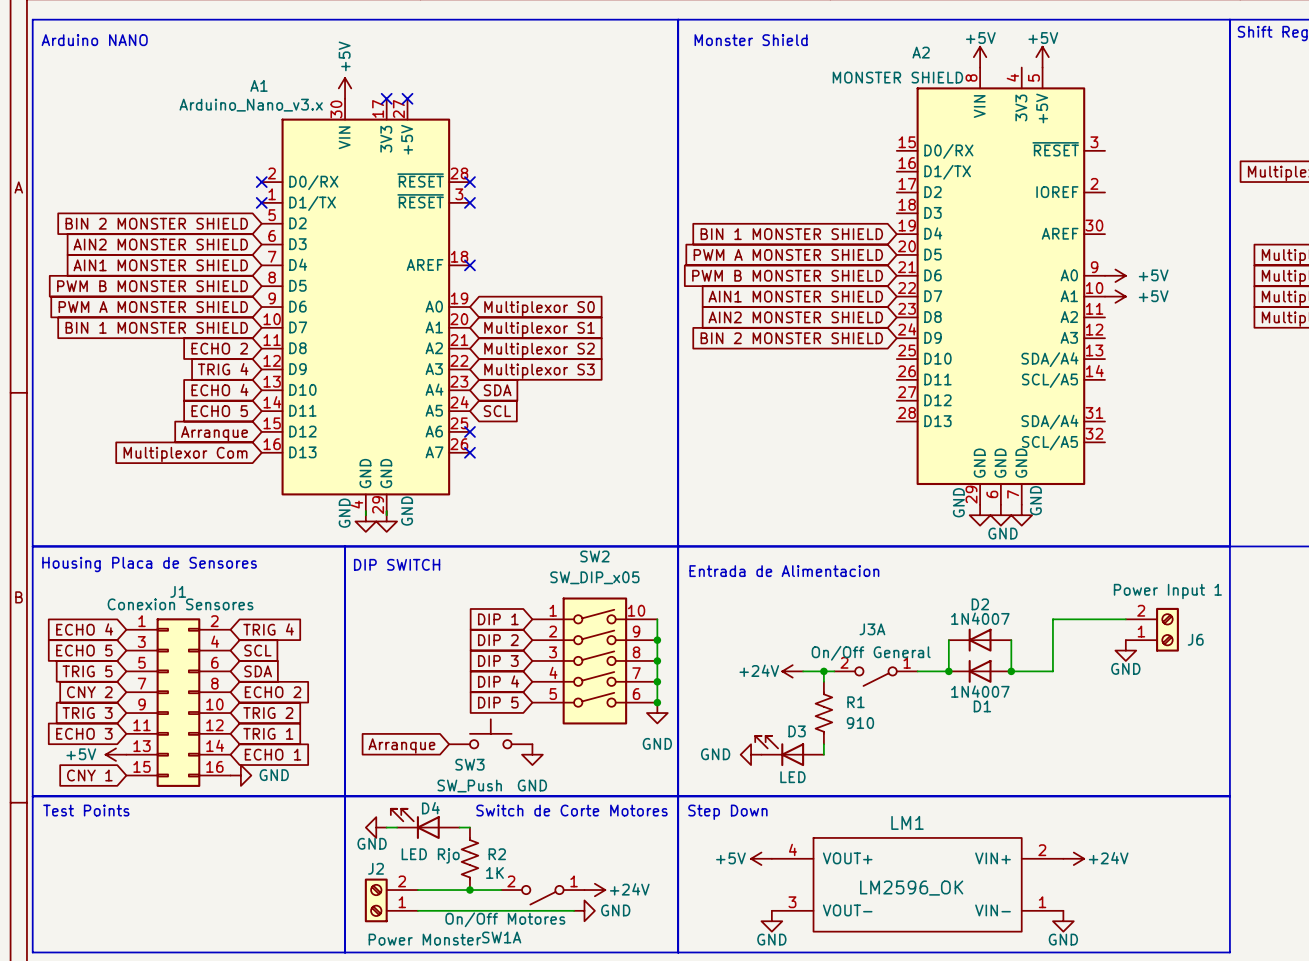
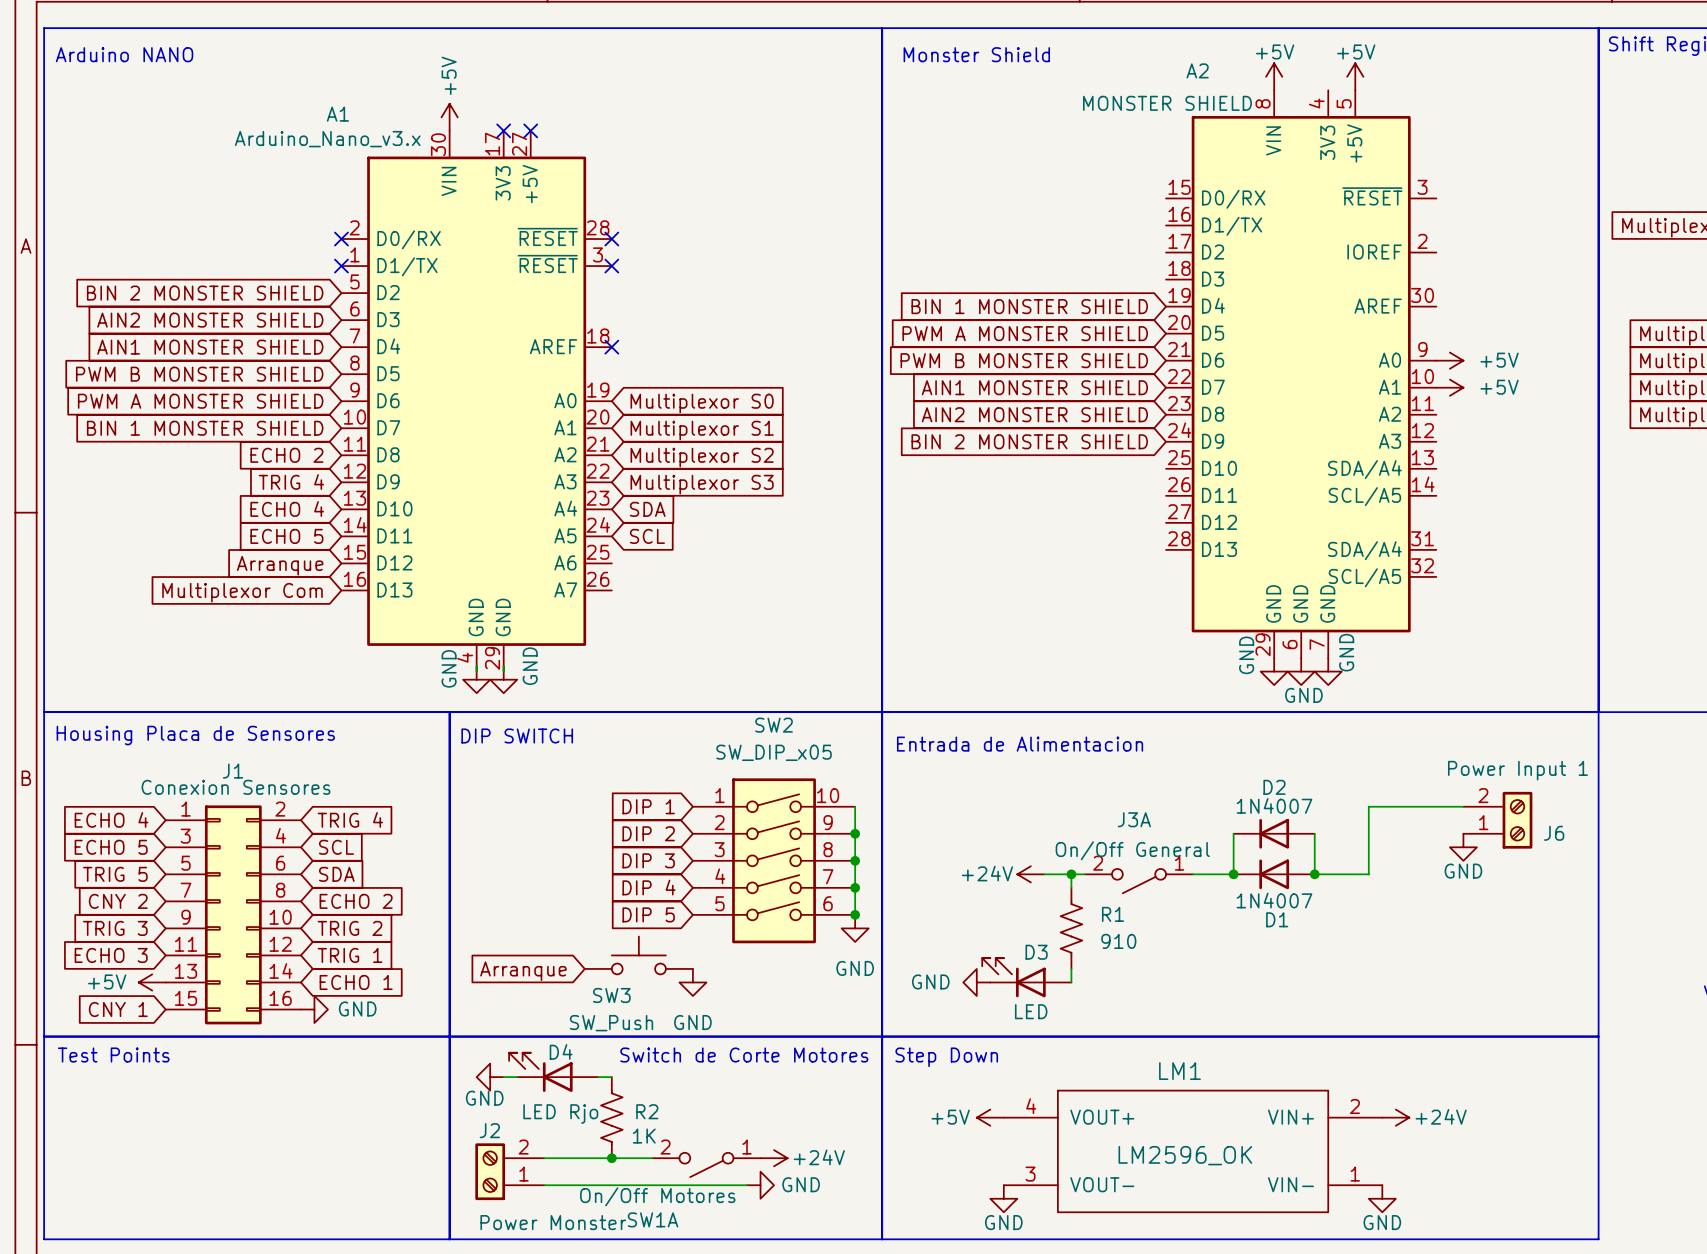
no-connect mark: (469, 431) -> none
no-connect mark: (469, 452) -> none

